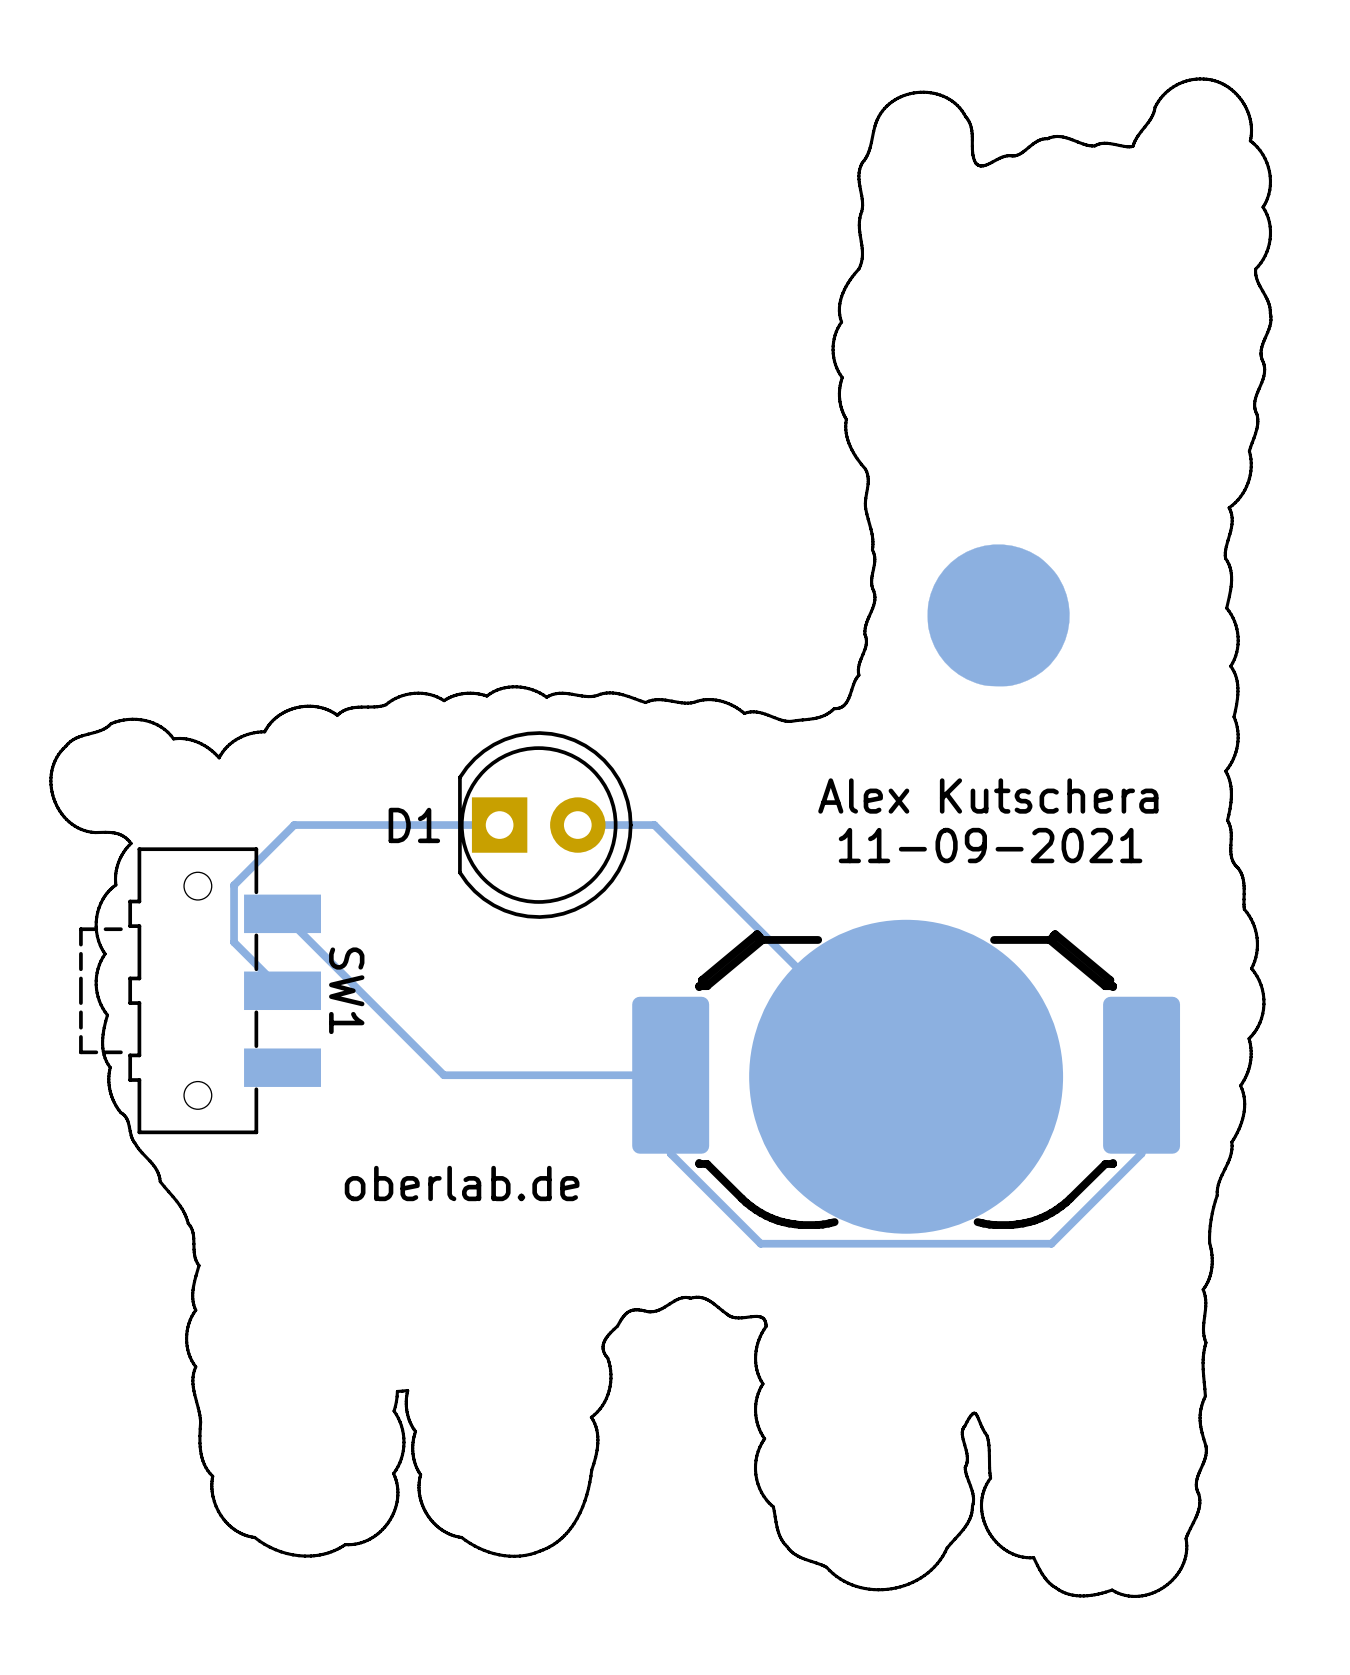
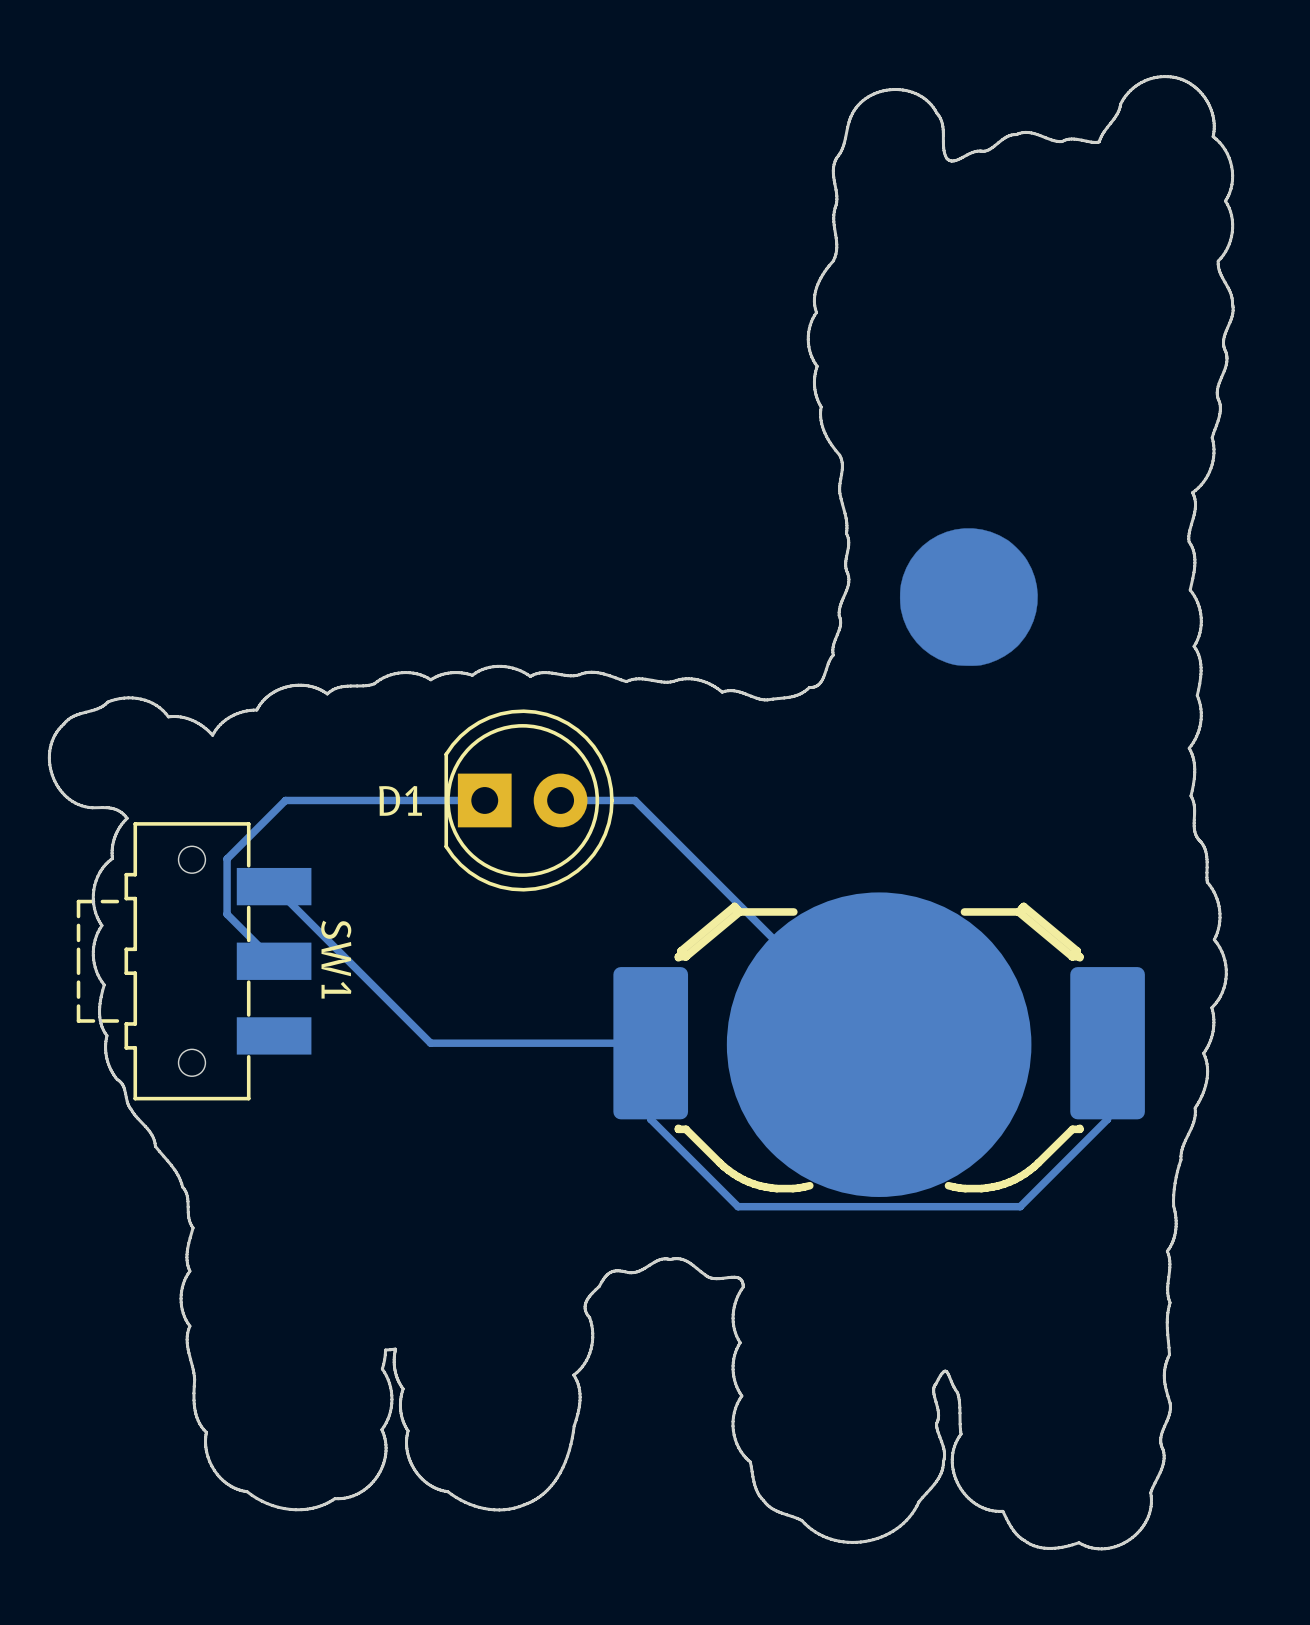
text: Alex Kutschera (988, 795) -> none
text: 11-09-2021 (990, 845) -> none
text: oberlab.de (462, 1183) -> none

